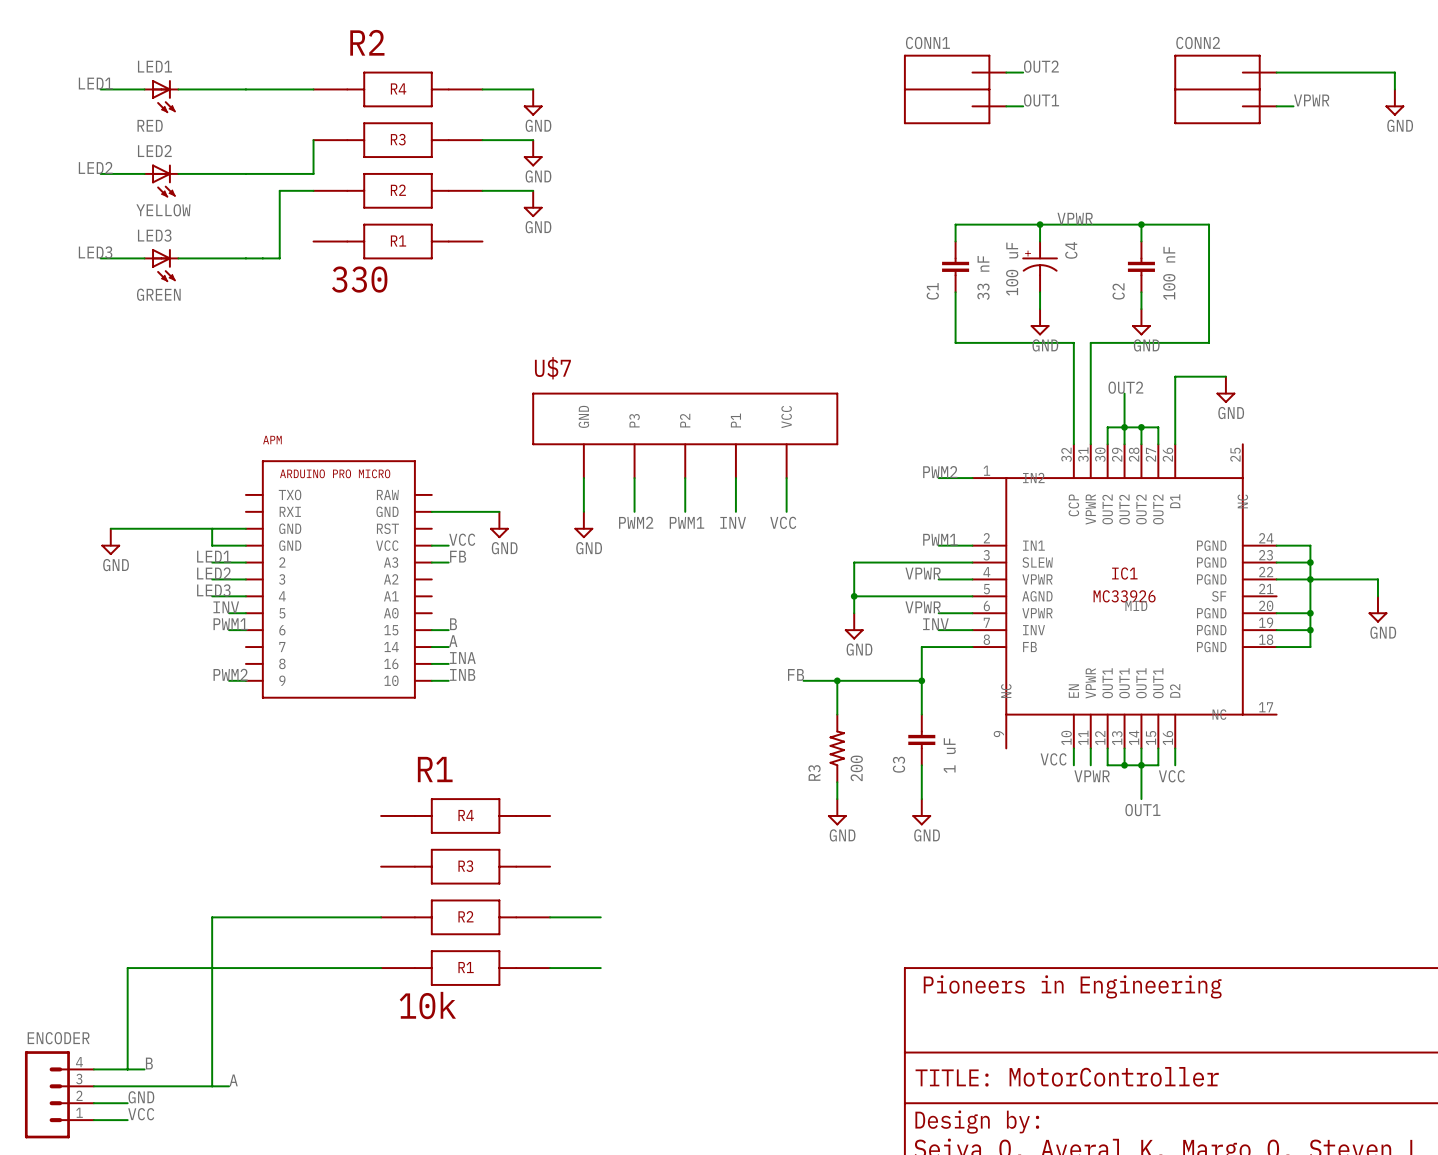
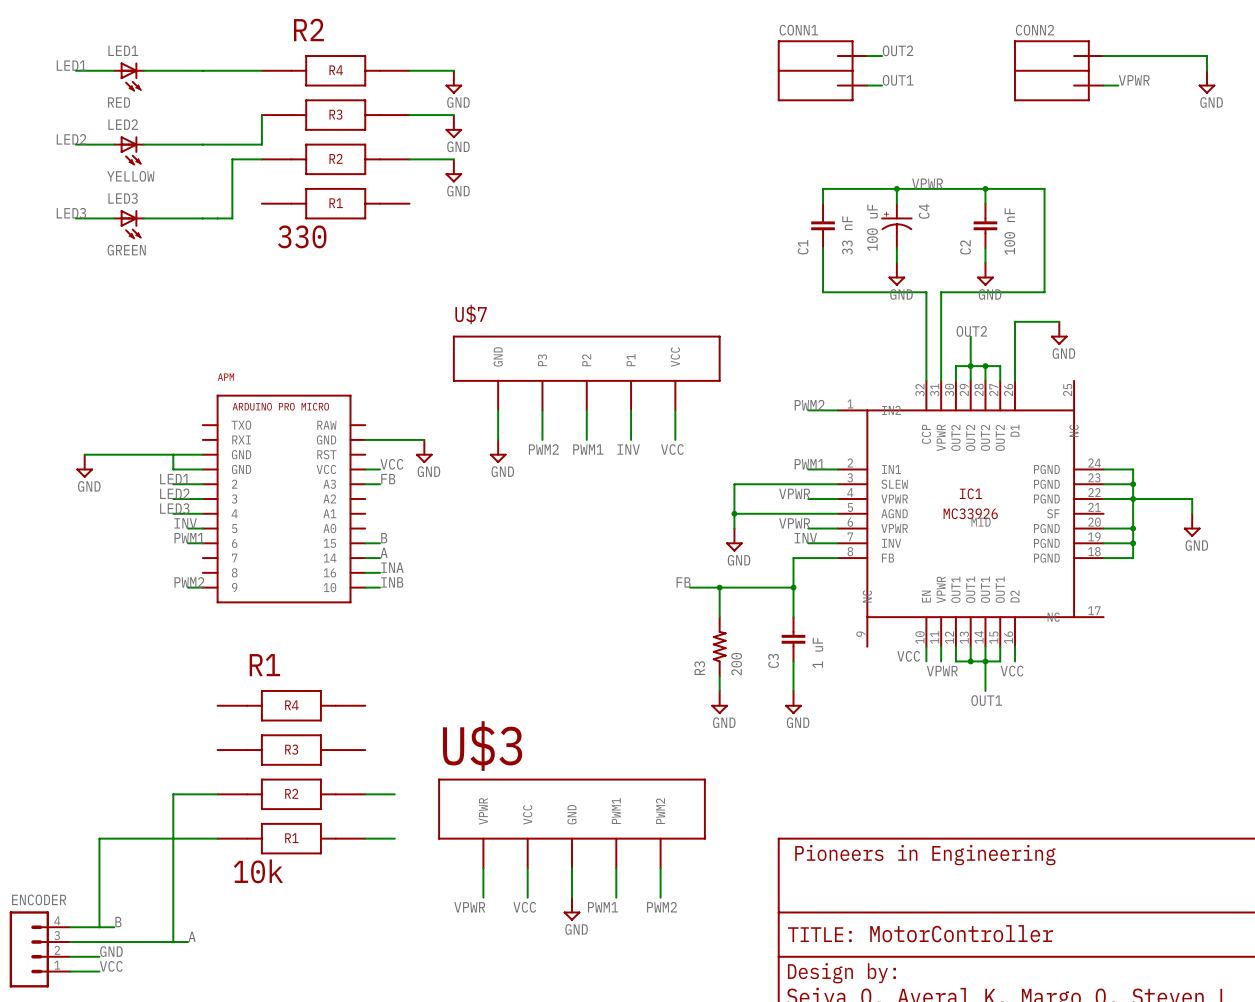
R1 position: (465, 892) -> (291, 772)
wire: (262, 917) (381, 917) -> none
wire: none -> (365, 794) (394, 794)
wire: (550, 917) (600, 917) -> none
U$3: none -> (572, 823)
wire: (262, 968) (381, 968) -> none
wire: none -> (365, 838) (394, 838)
wire: none -> (483, 868) (483, 897)
wire: none -> (527, 868) (527, 897)
wire: none -> (572, 868) (572, 897)
wire: none -> (616, 868) (616, 897)
wire: none -> (660, 868) (660, 897)
label: none -> VPWR (469, 907)
label: none -> VCC (524, 907)
label: none -> PWM1 (603, 907)
label: none -> PWM2 (662, 907)
power symbol: none -> GND (572, 909)

